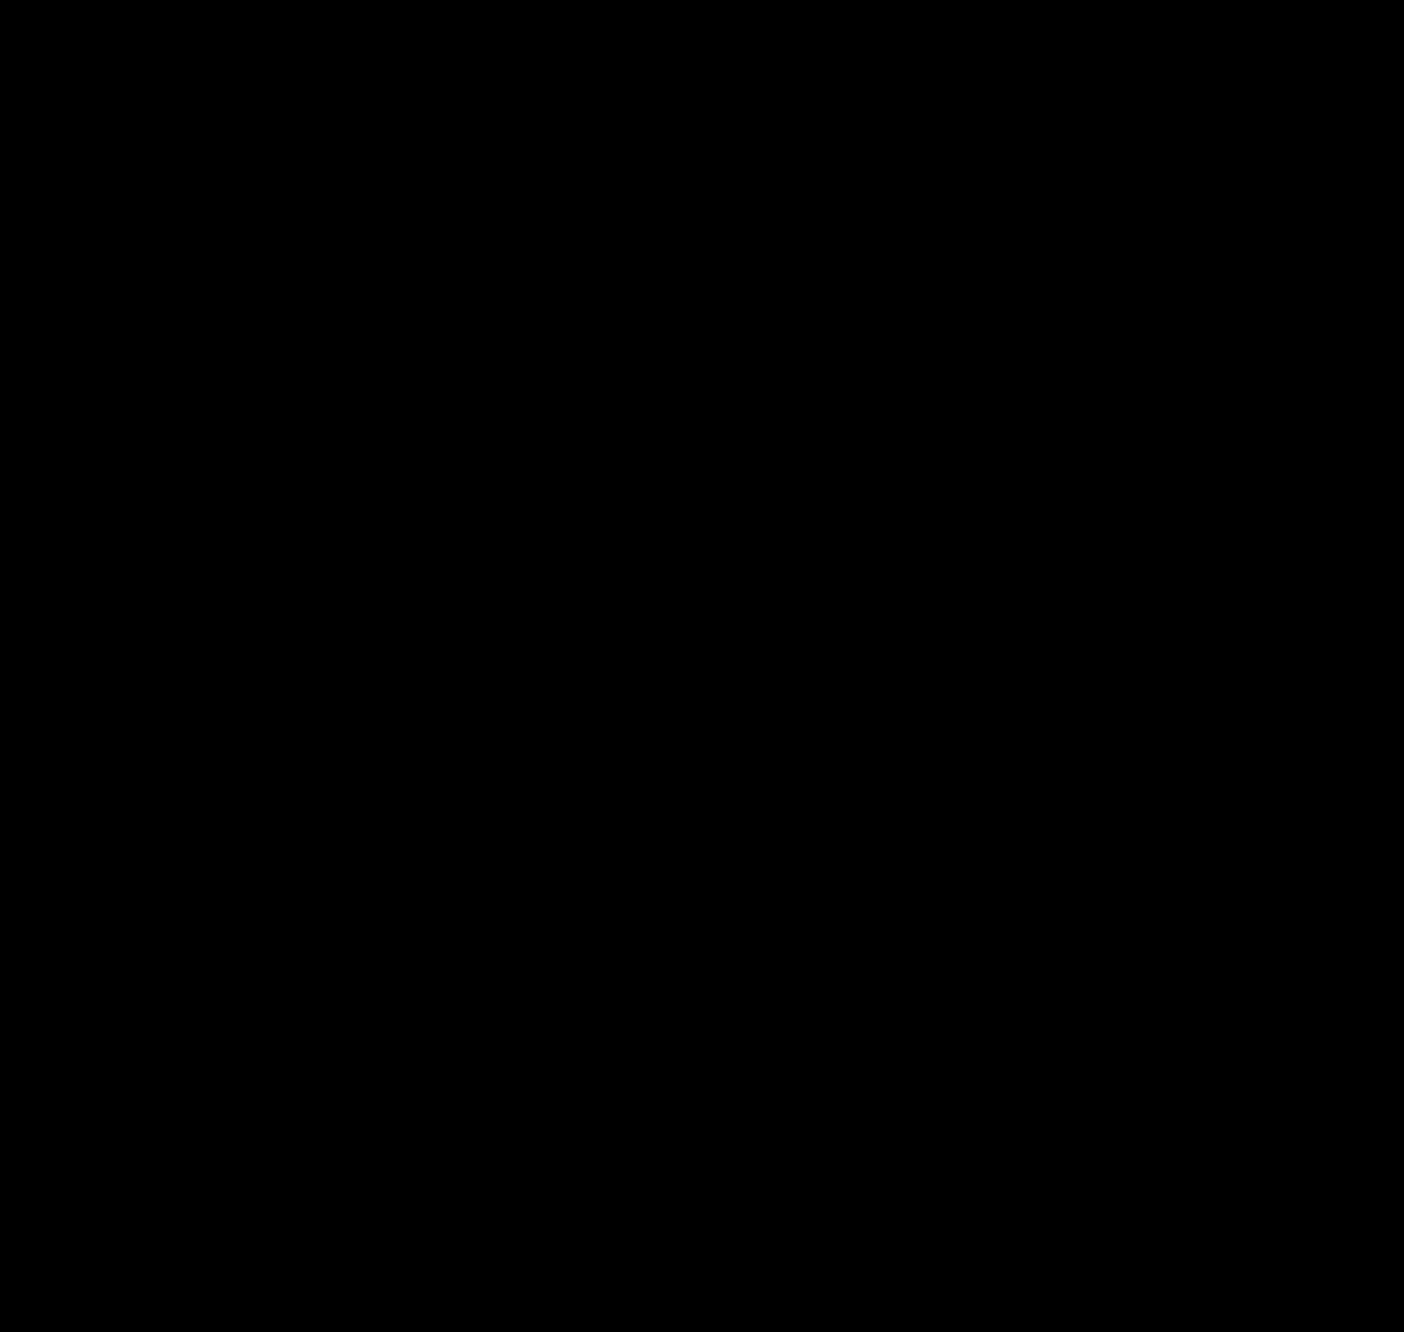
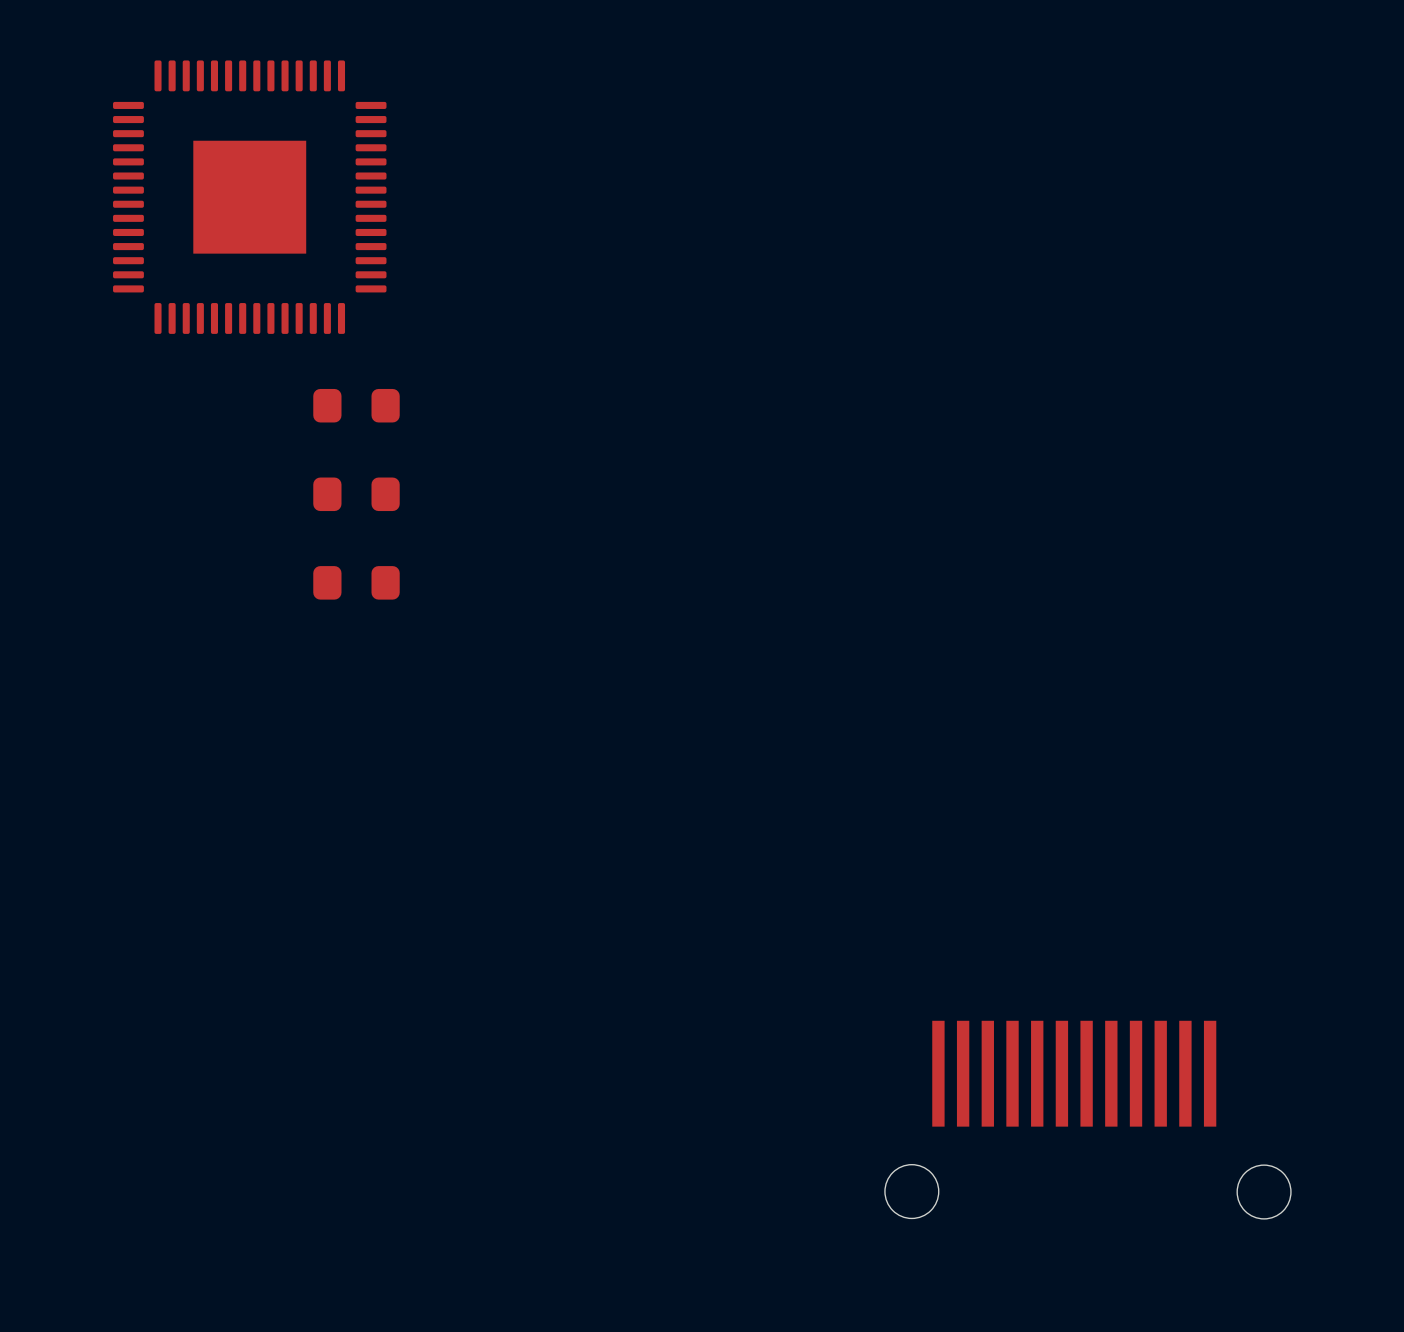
part: none -> (249, 197)
part: none -> (356, 405)
part: none -> (356, 494)
part: none -> (356, 582)
part: none -> (1087, 1119)

